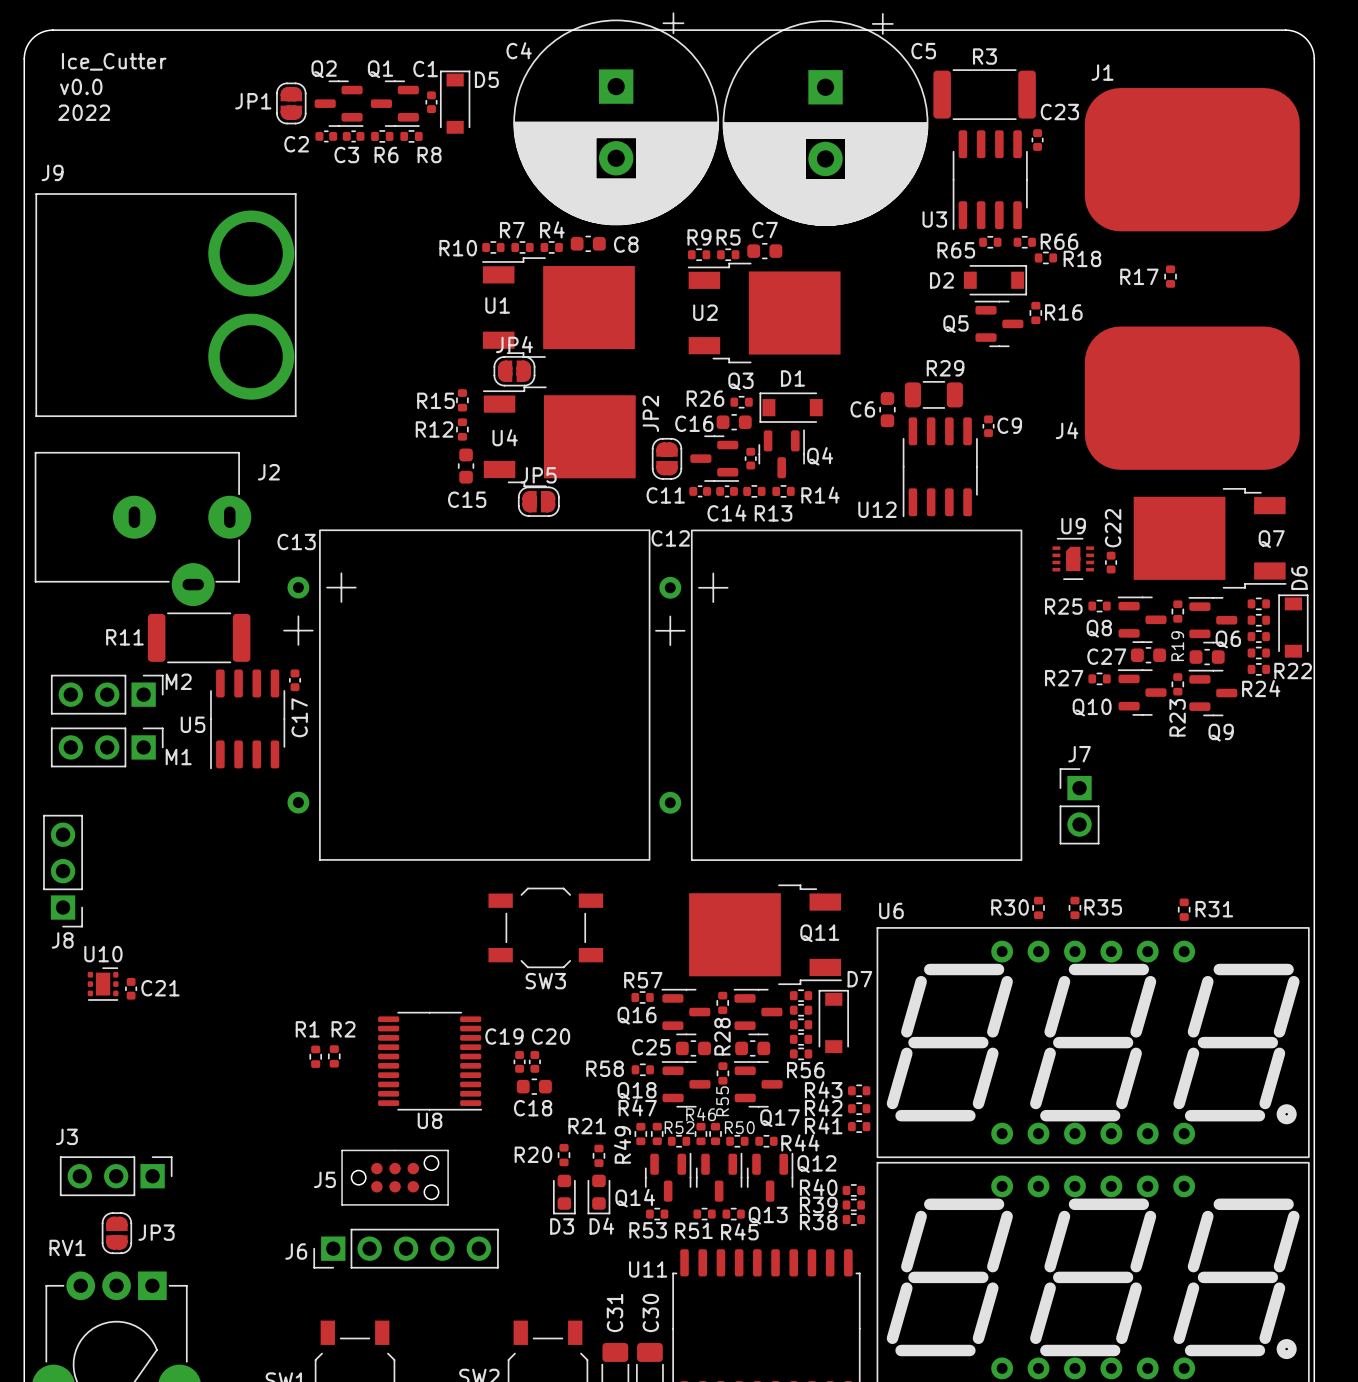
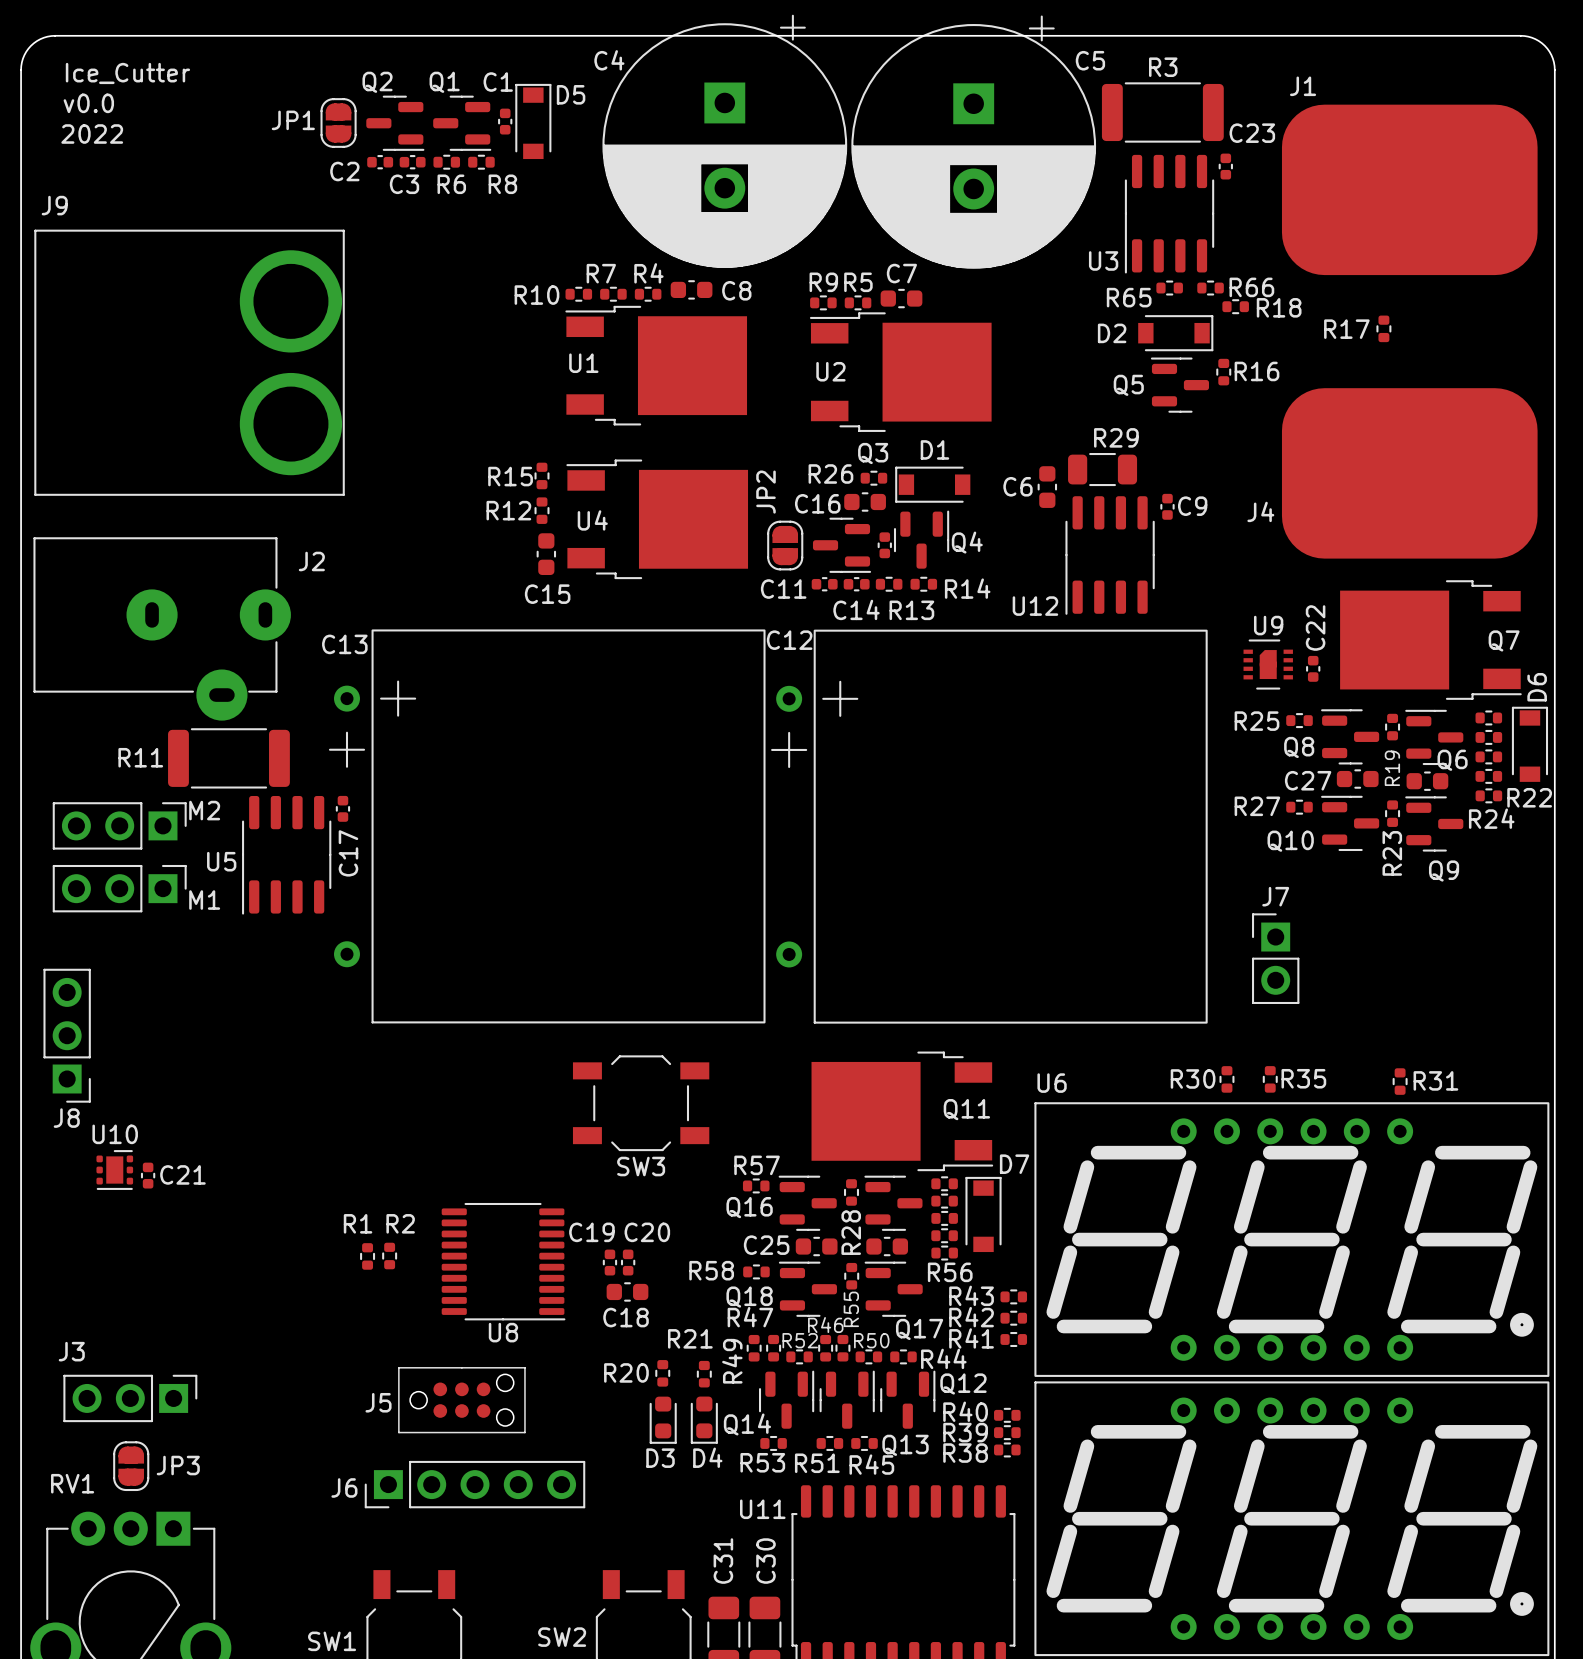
JP4: (514, 371) -> none
JP5: (538, 501) -> none

